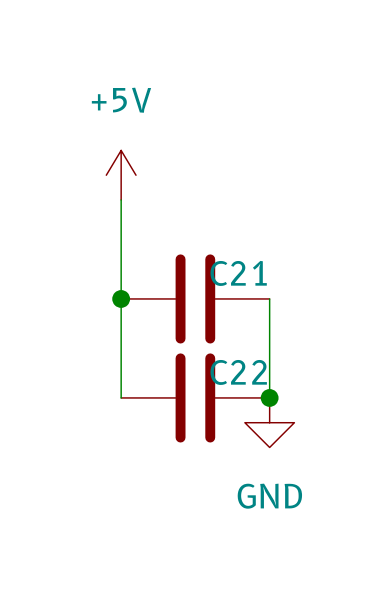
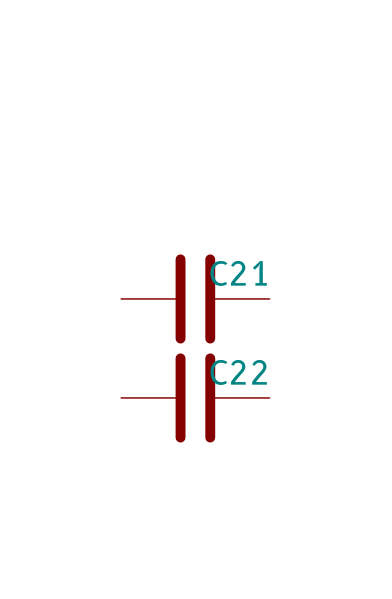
power symbol: +5V (121, 175) -> none
wire: (121, 199) (121, 397) -> none
junction: (121, 298) -> none
wire: (269, 298) (269, 397) -> none
junction: (269, 397) -> none
power symbol: GND (269, 422) -> none

